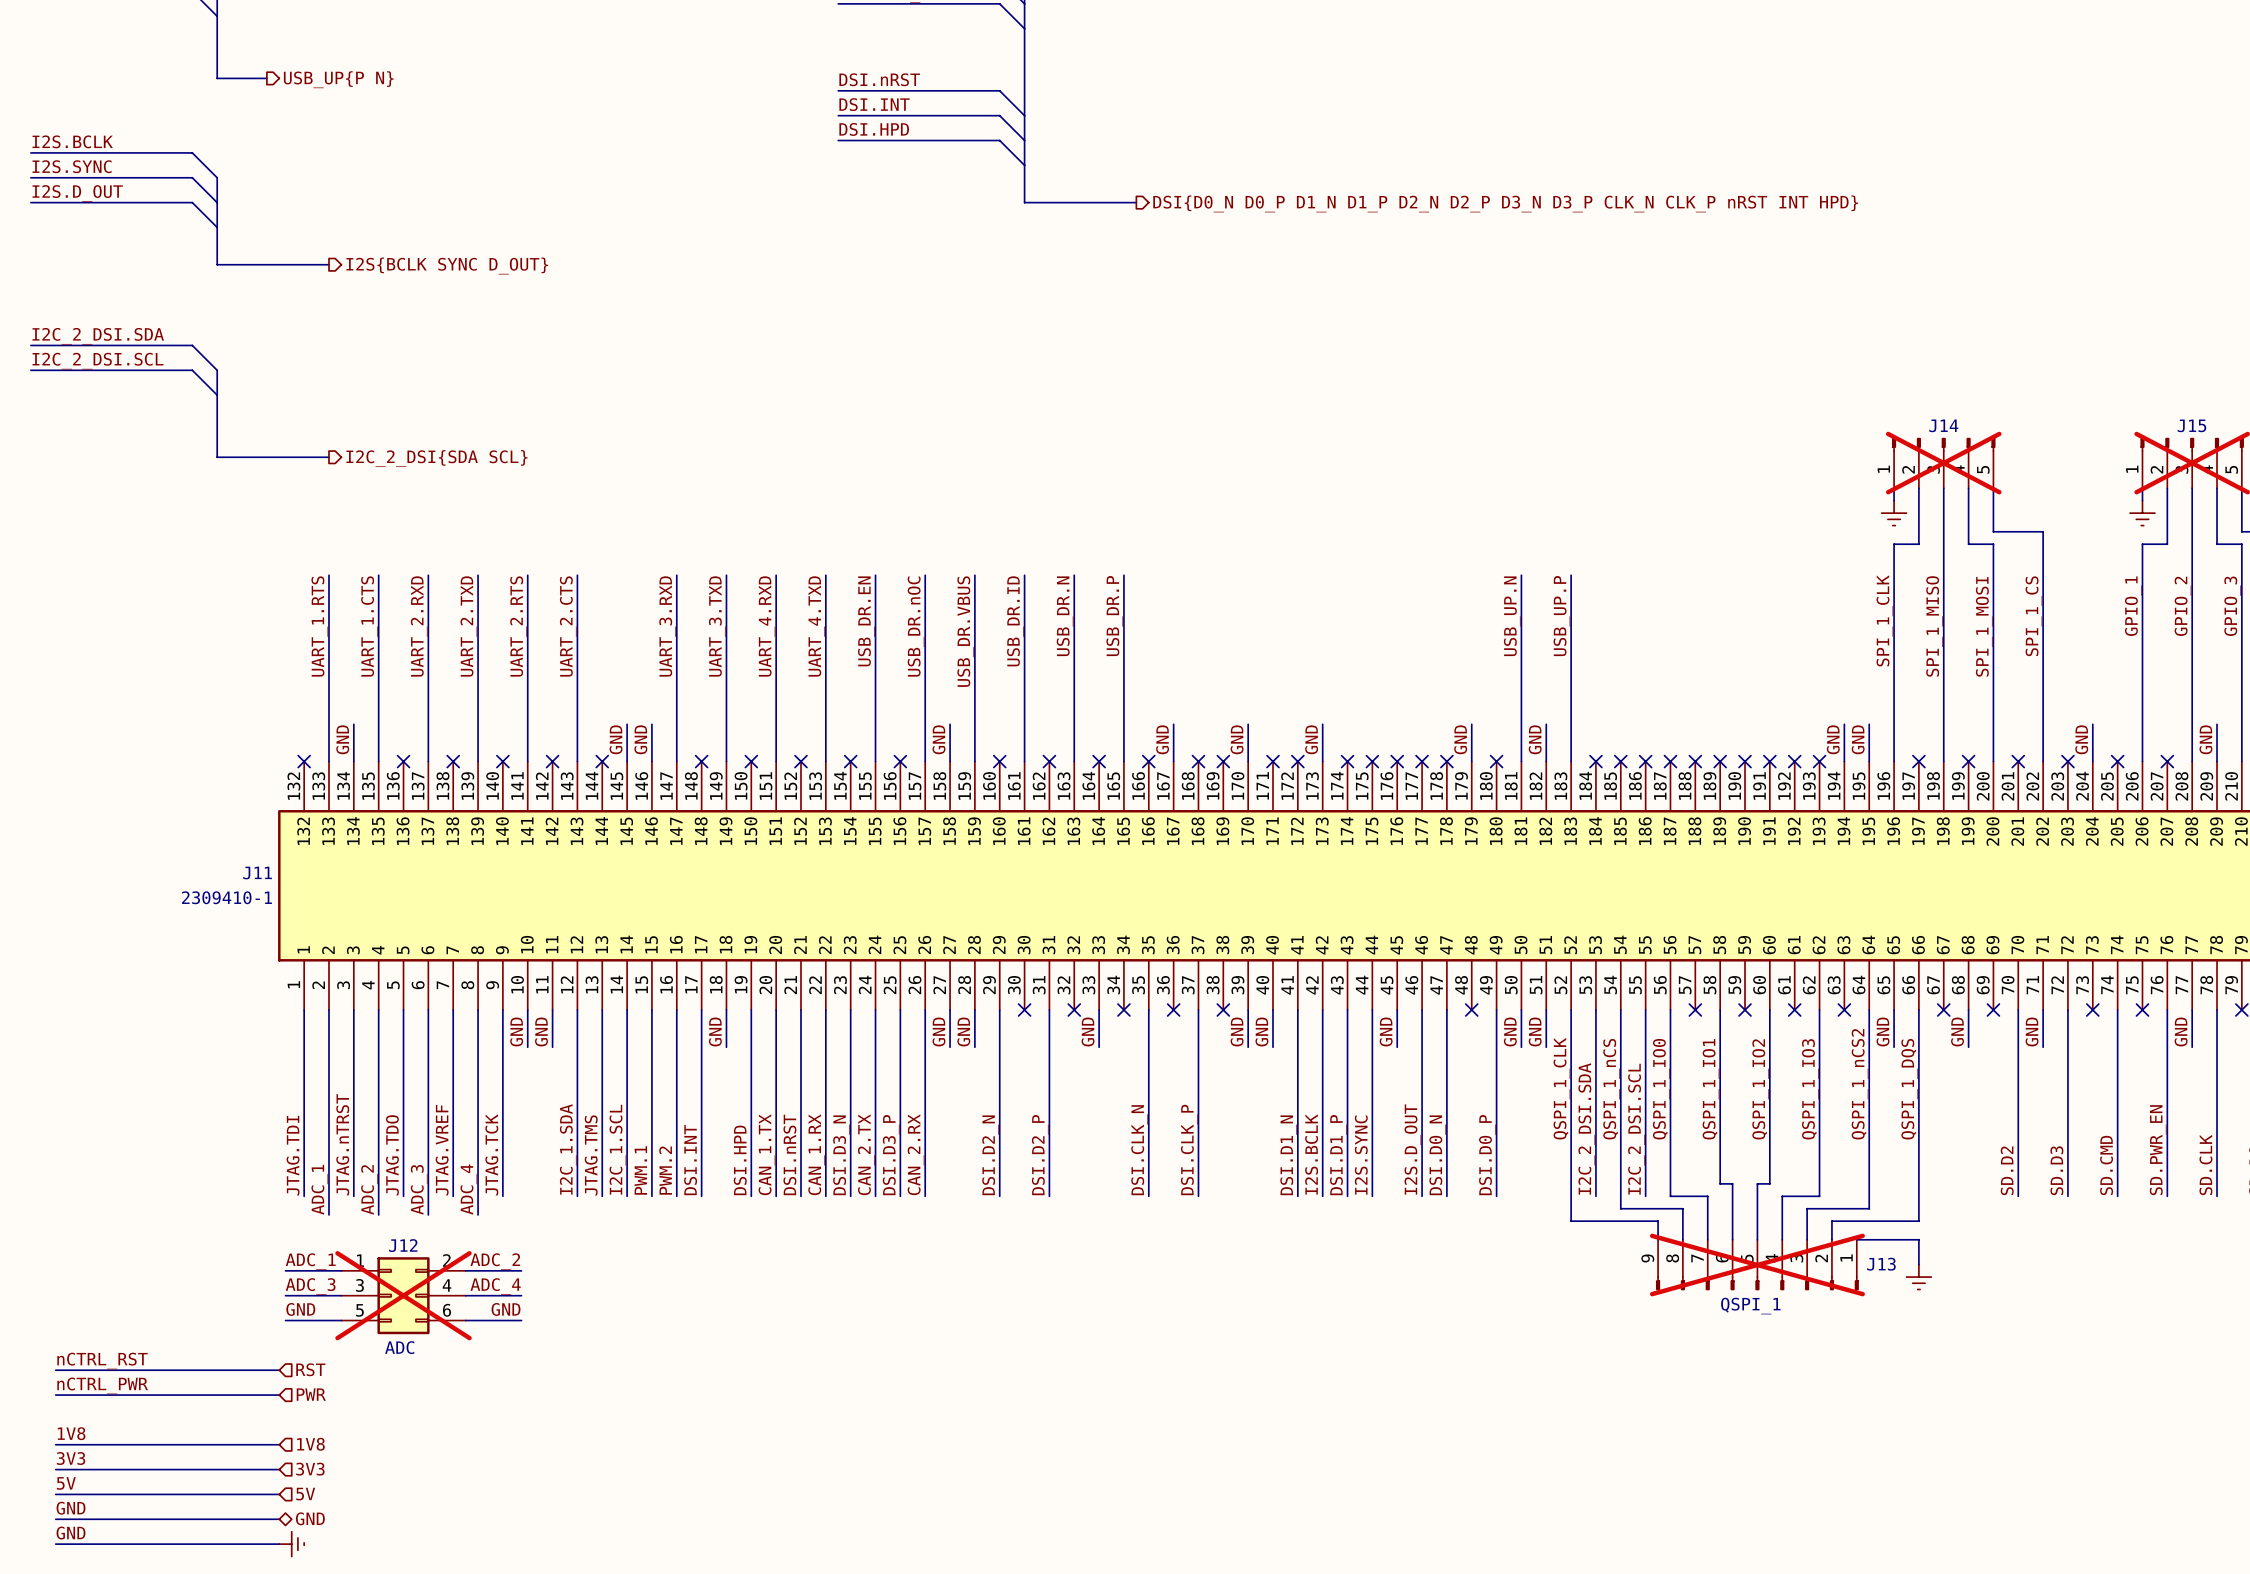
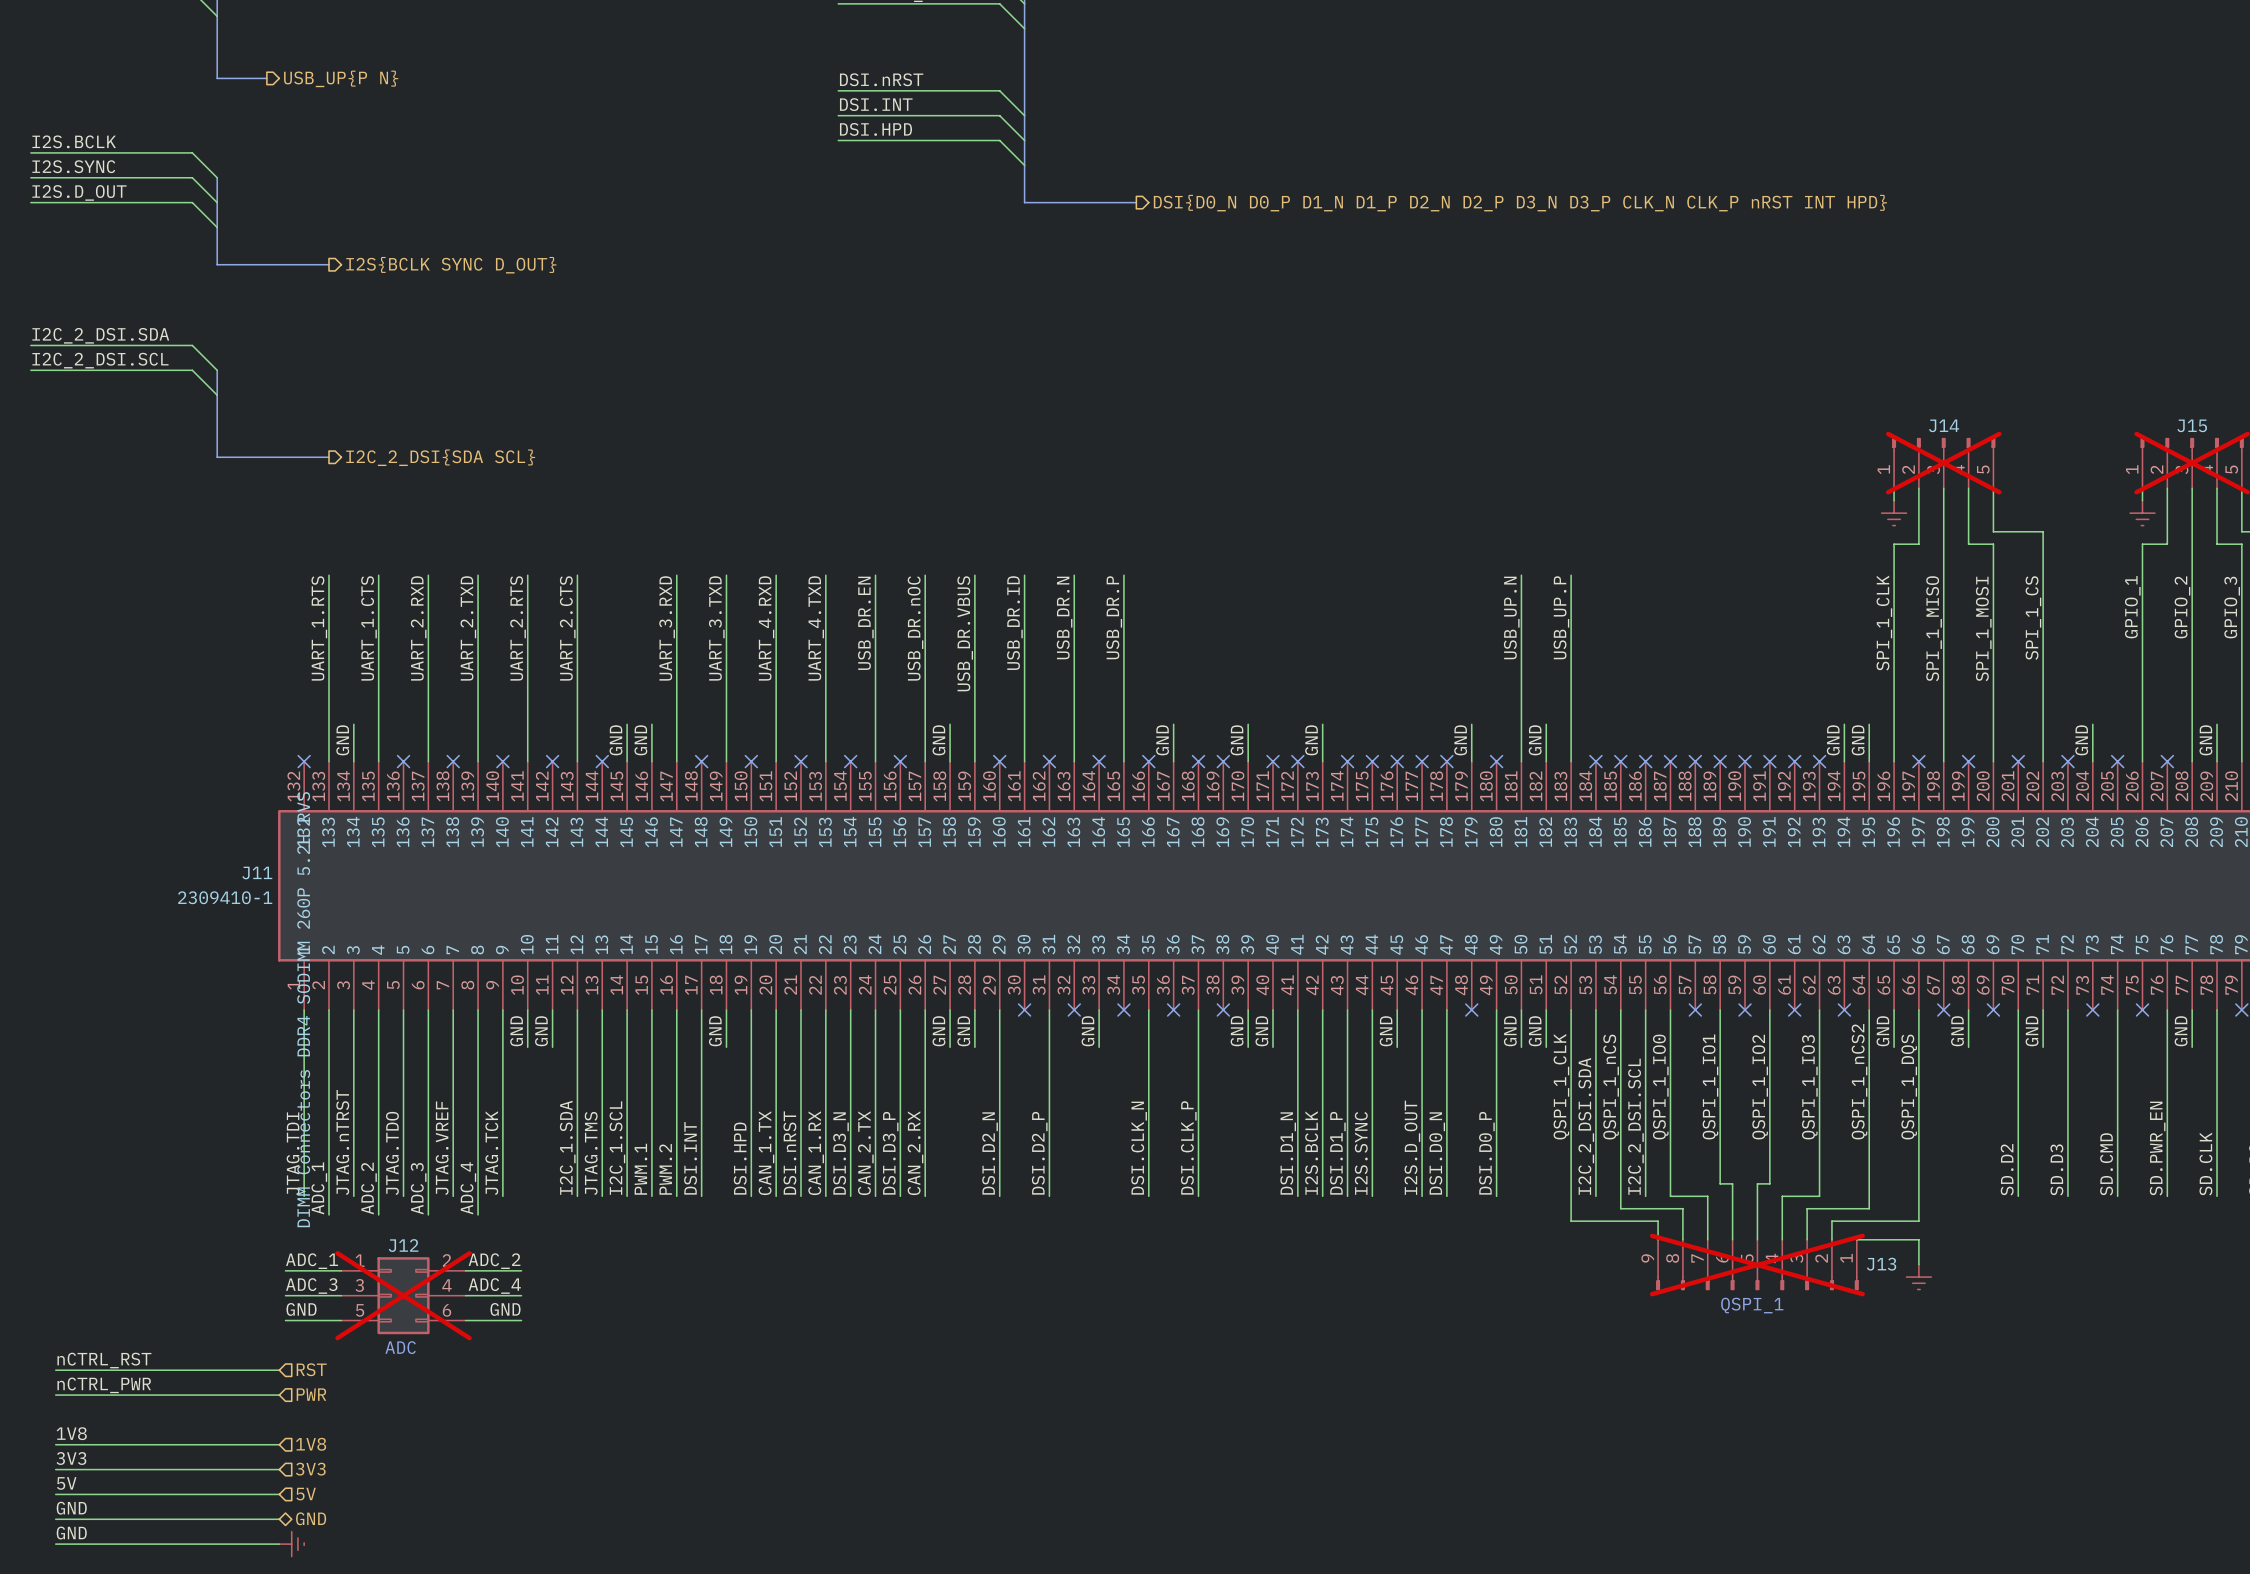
J11 text: none -> DIMM Connectors DDR4 SODIMM 260P 5.2H RVS (303, 1009)

